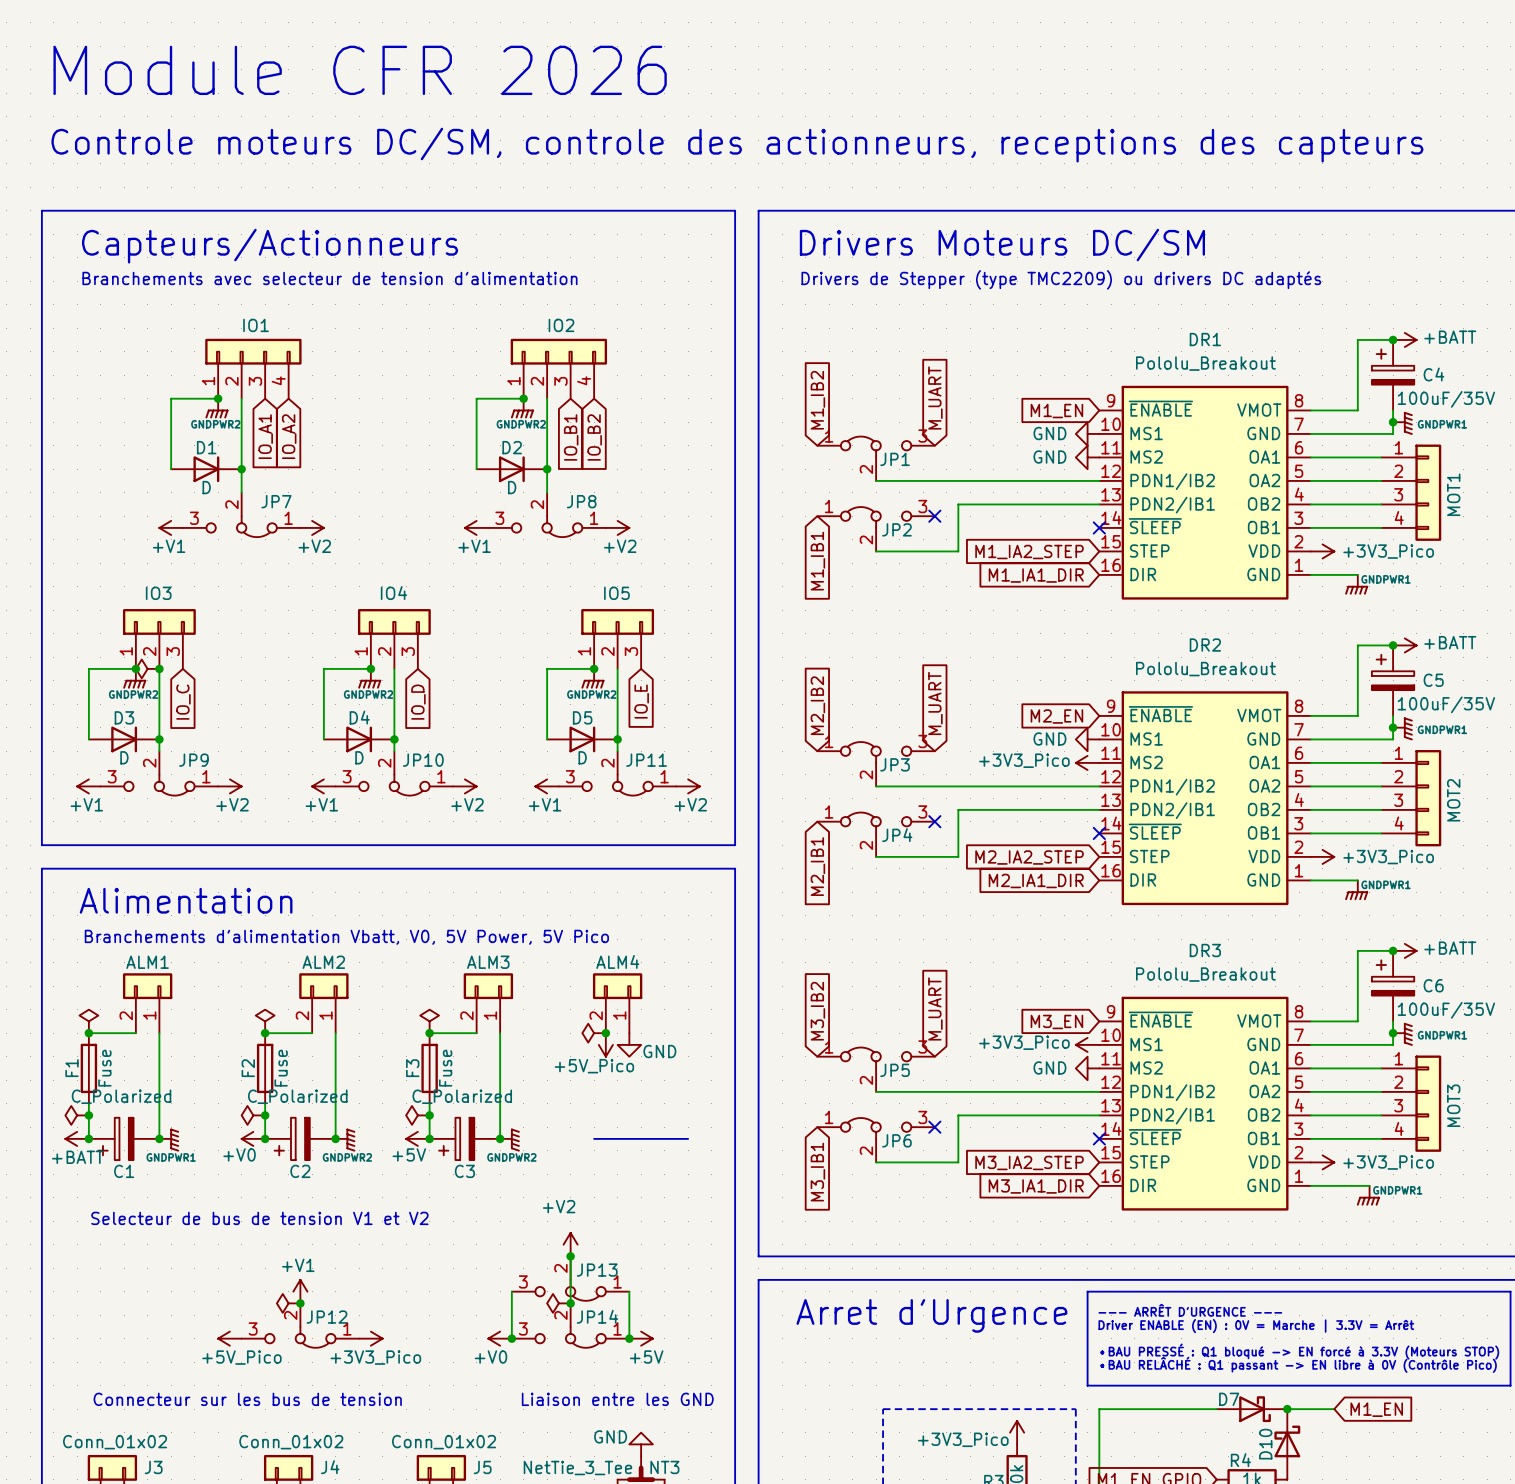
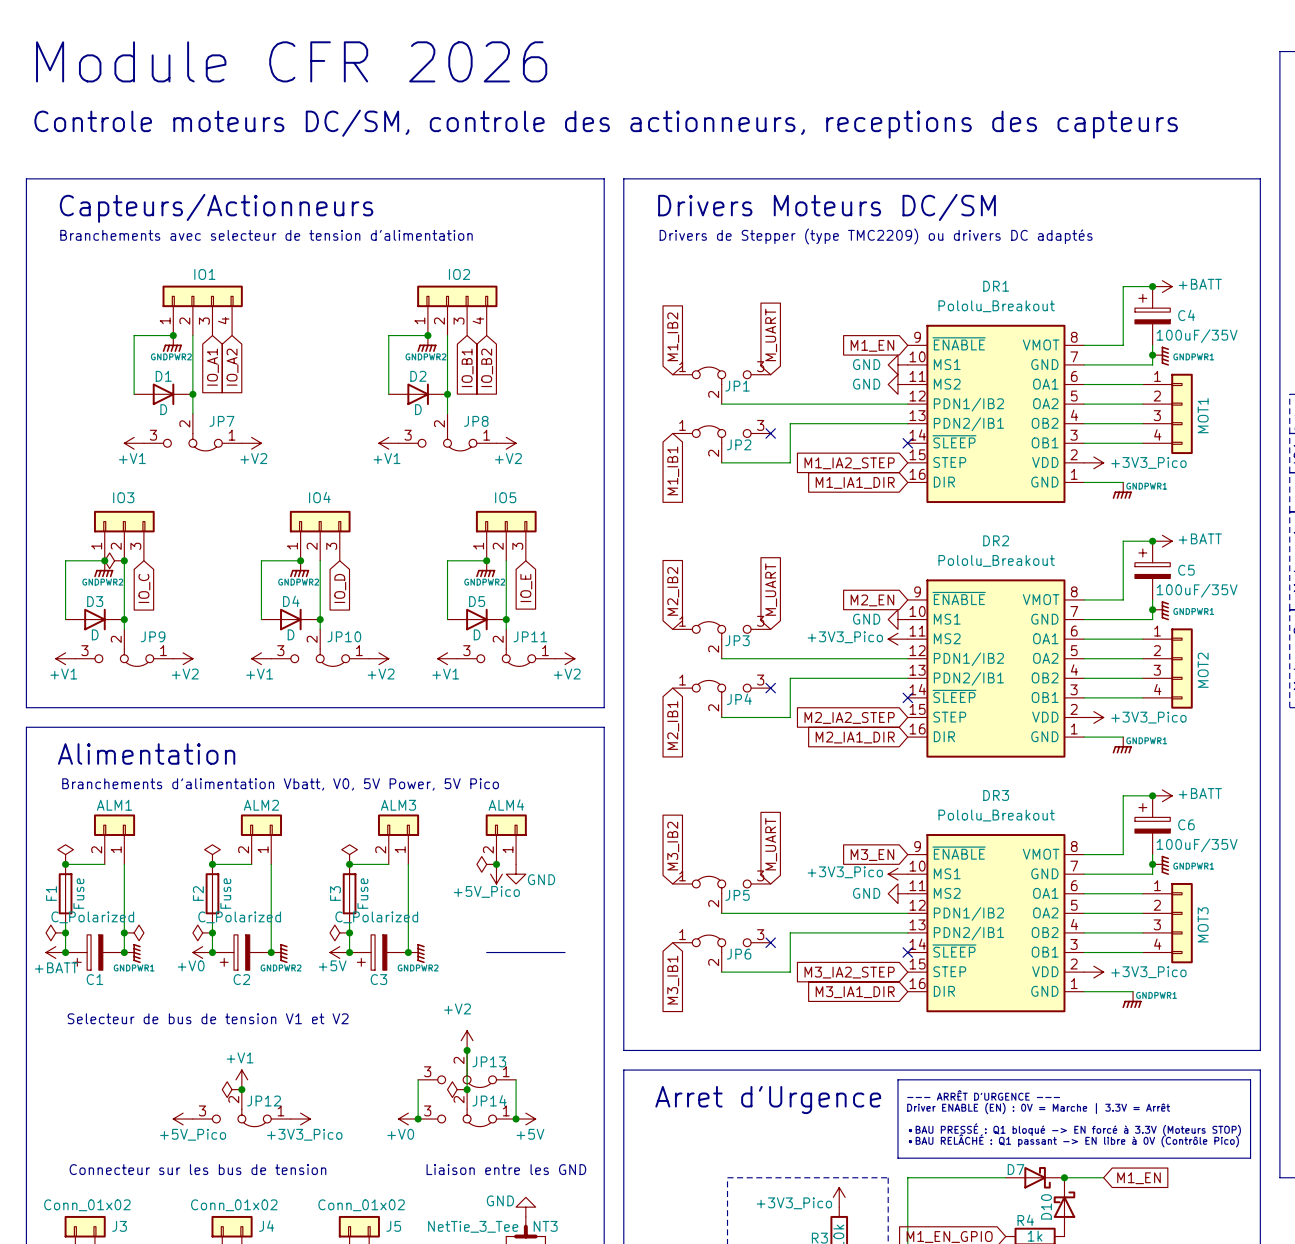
junction: none -> (124, 932)
power symbol: none -> (134, 932)

